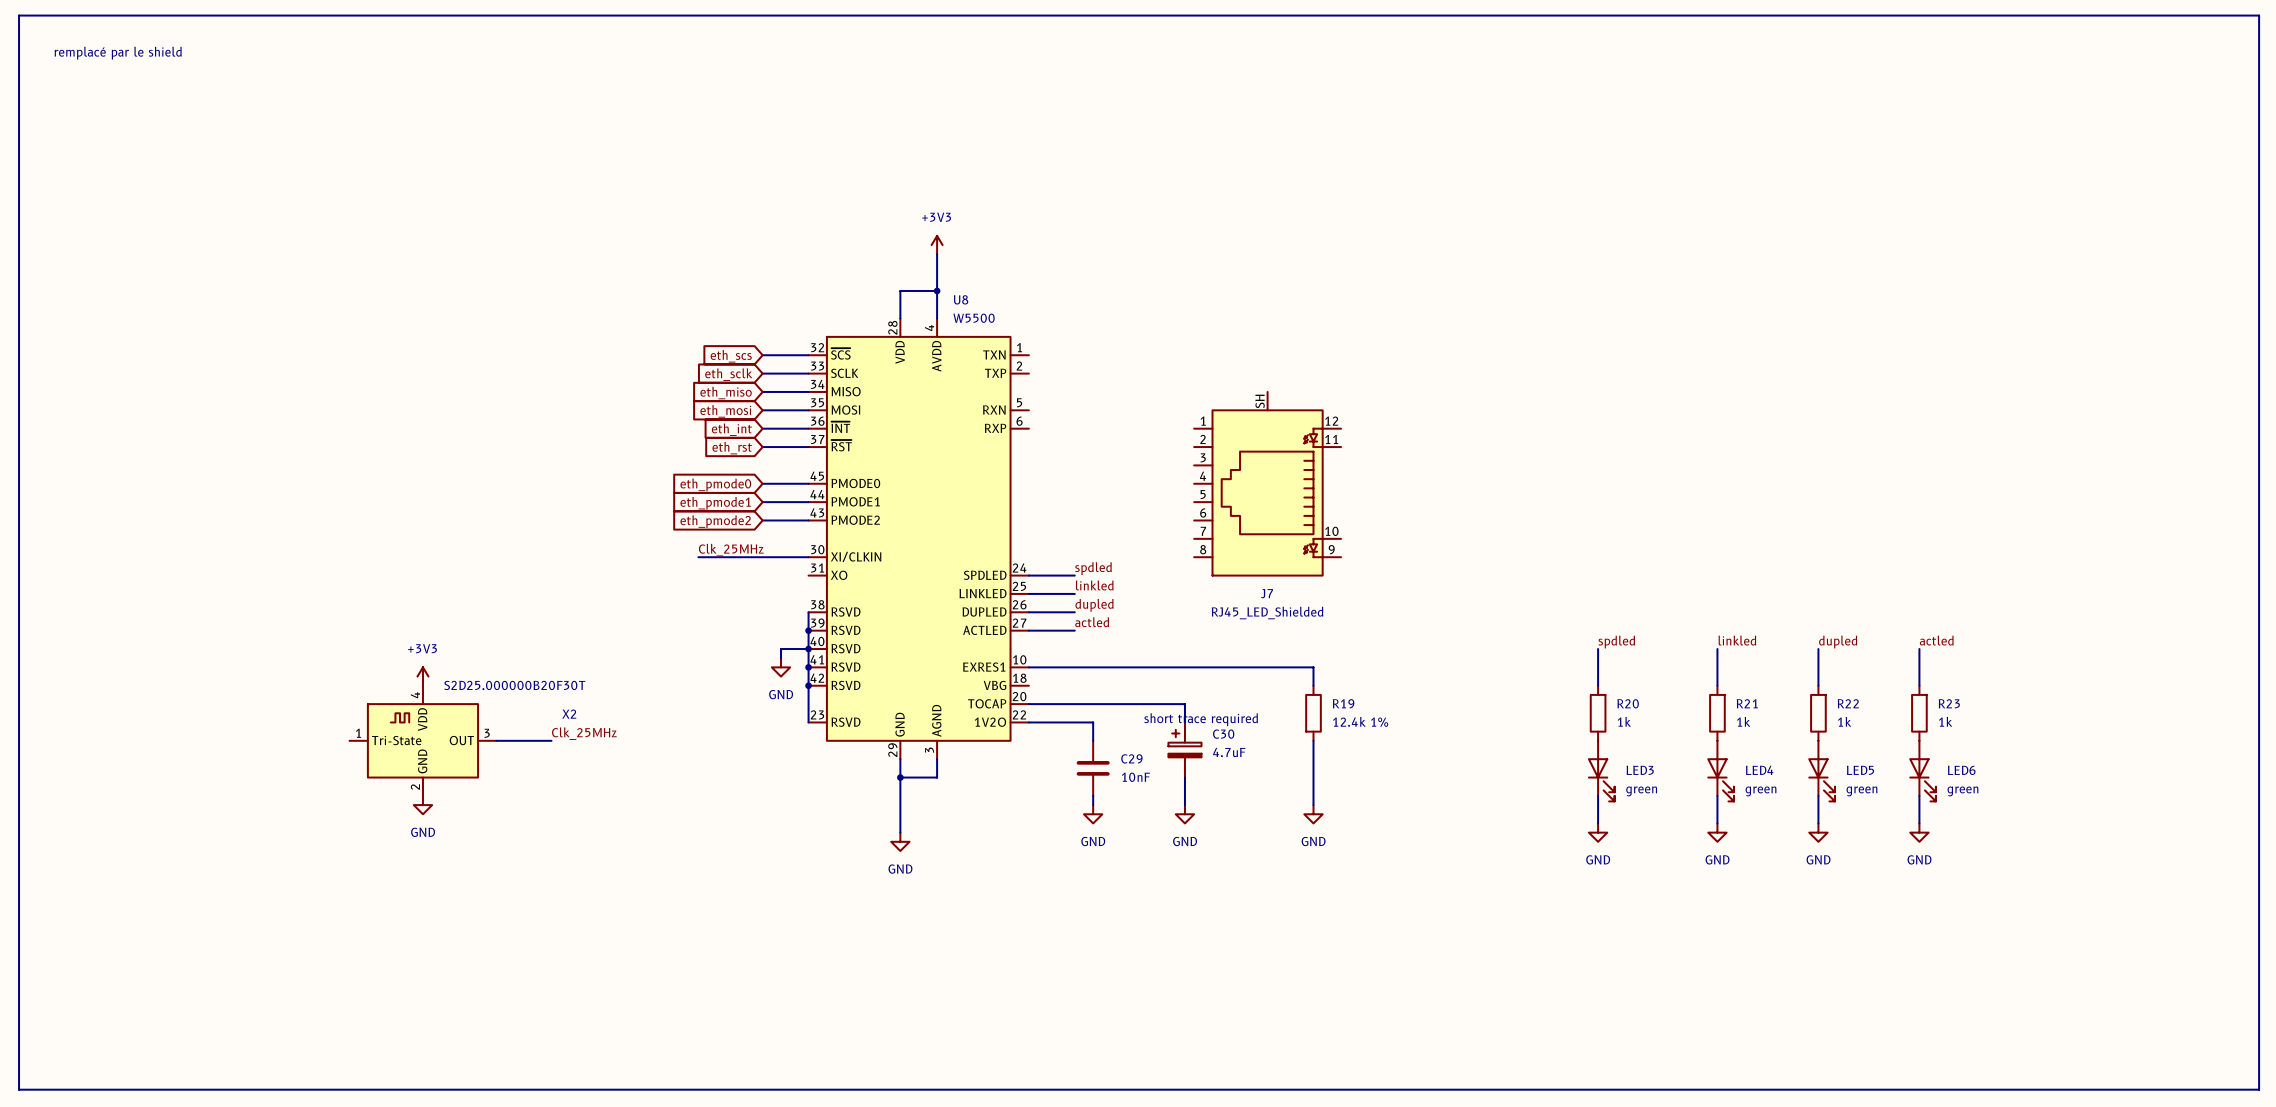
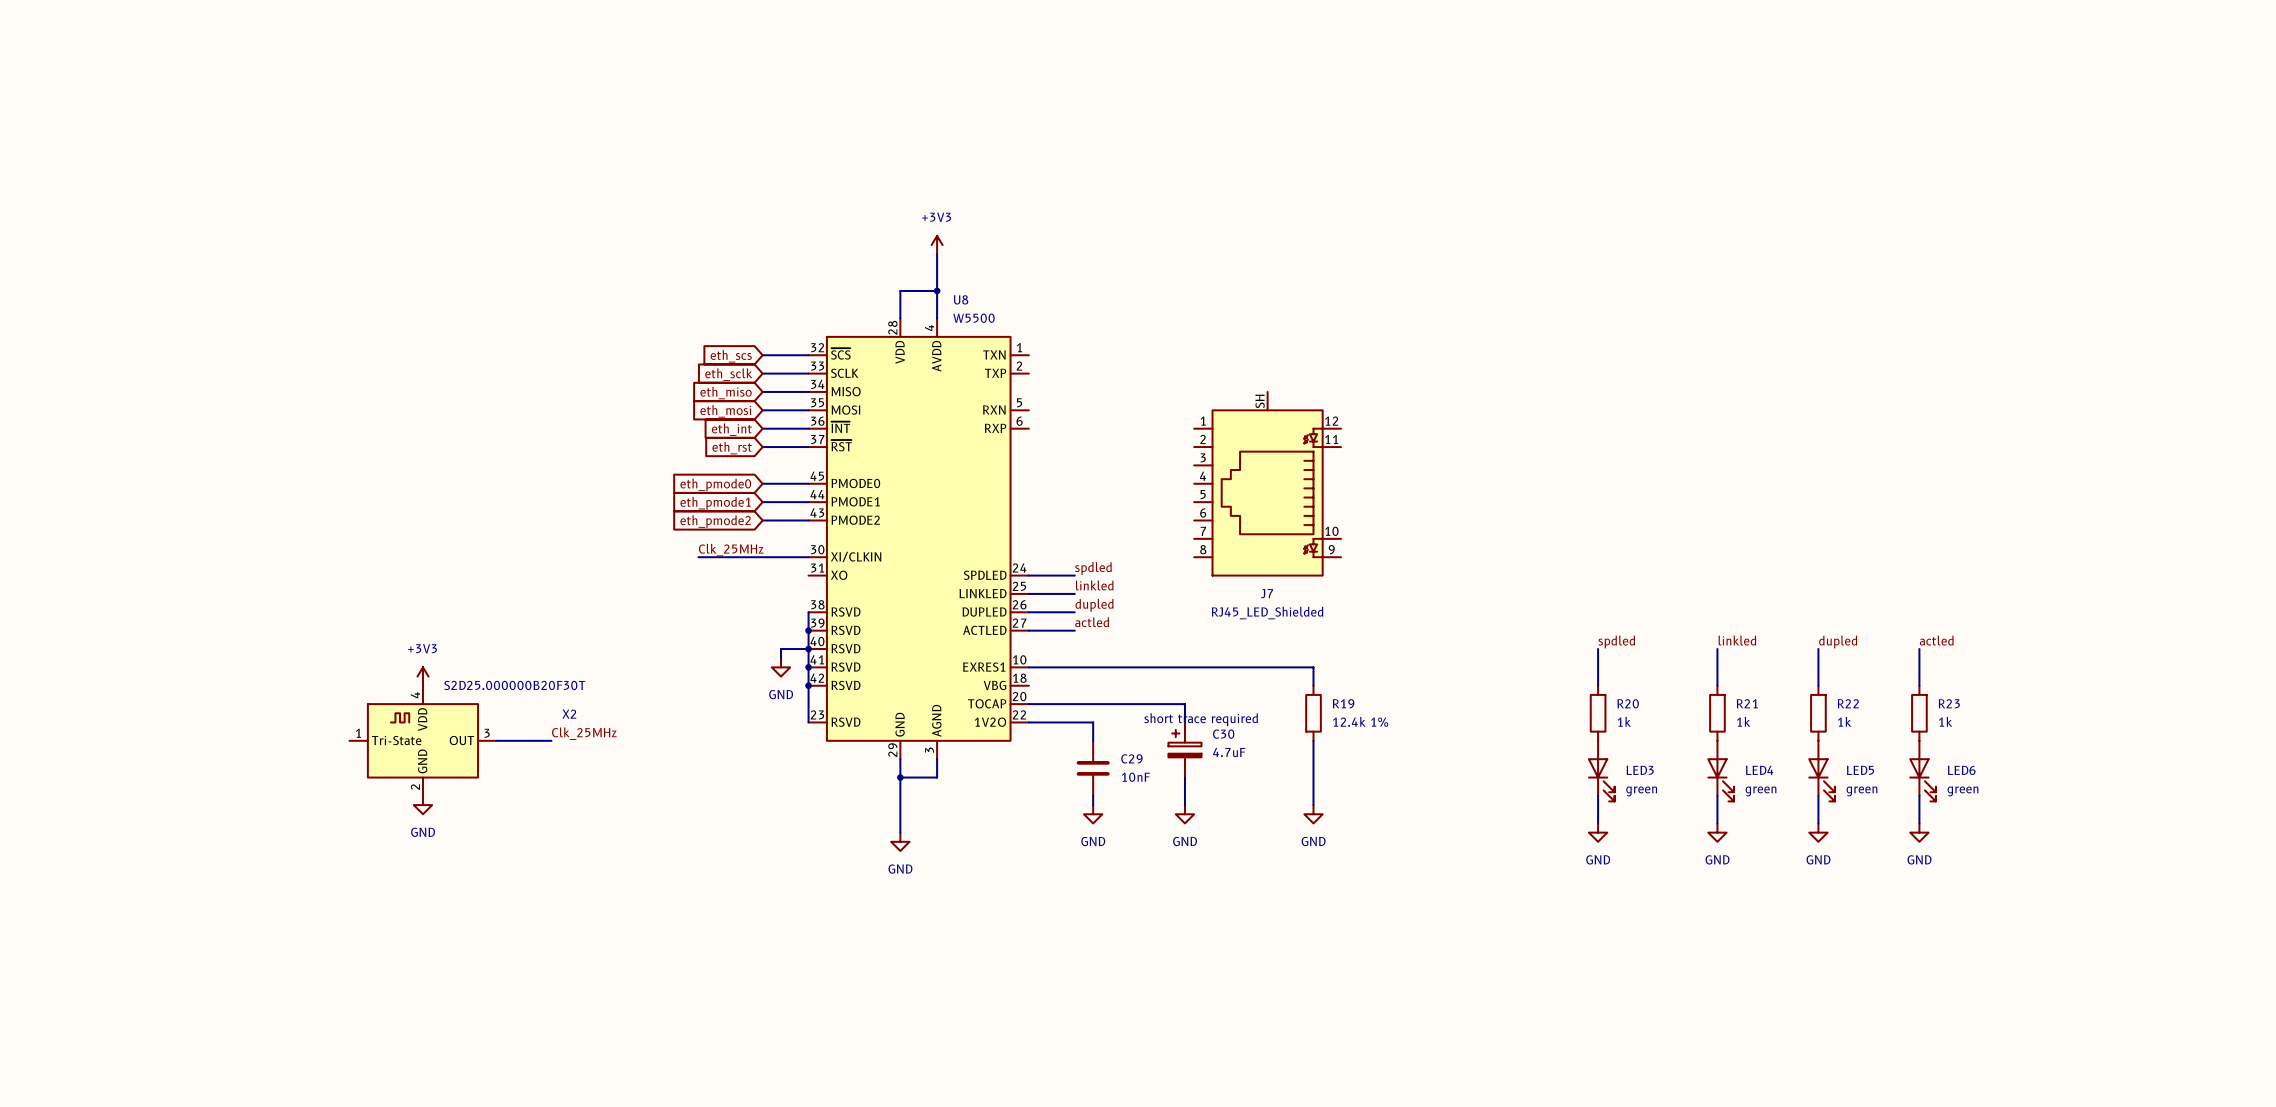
line: (19, 15) (2259, 15) (2259, 1089) (19, 1089) (19, 15) -> none
text: remplacé par le shield (118, 53) -> none

